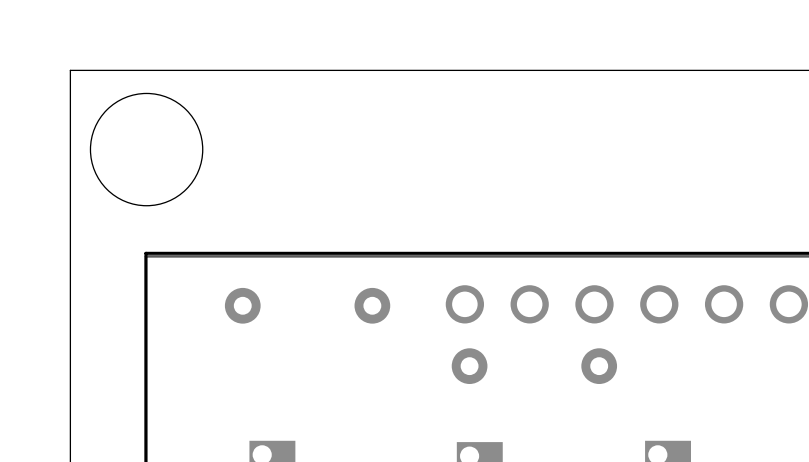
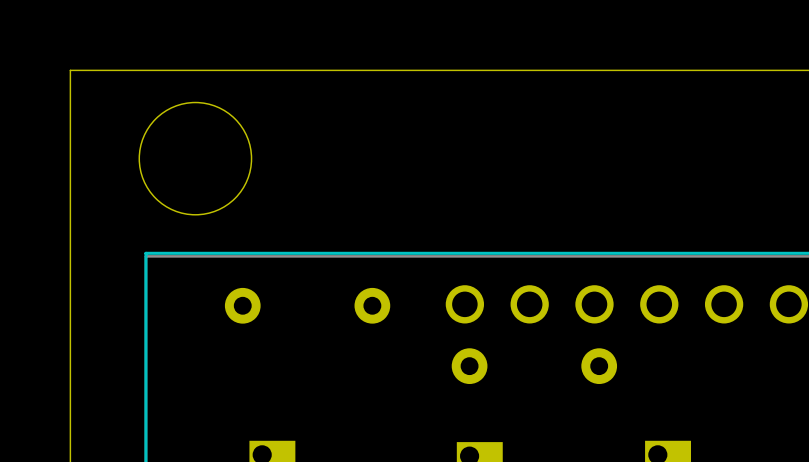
round board edge position: (146, 149) -> (195, 158)

